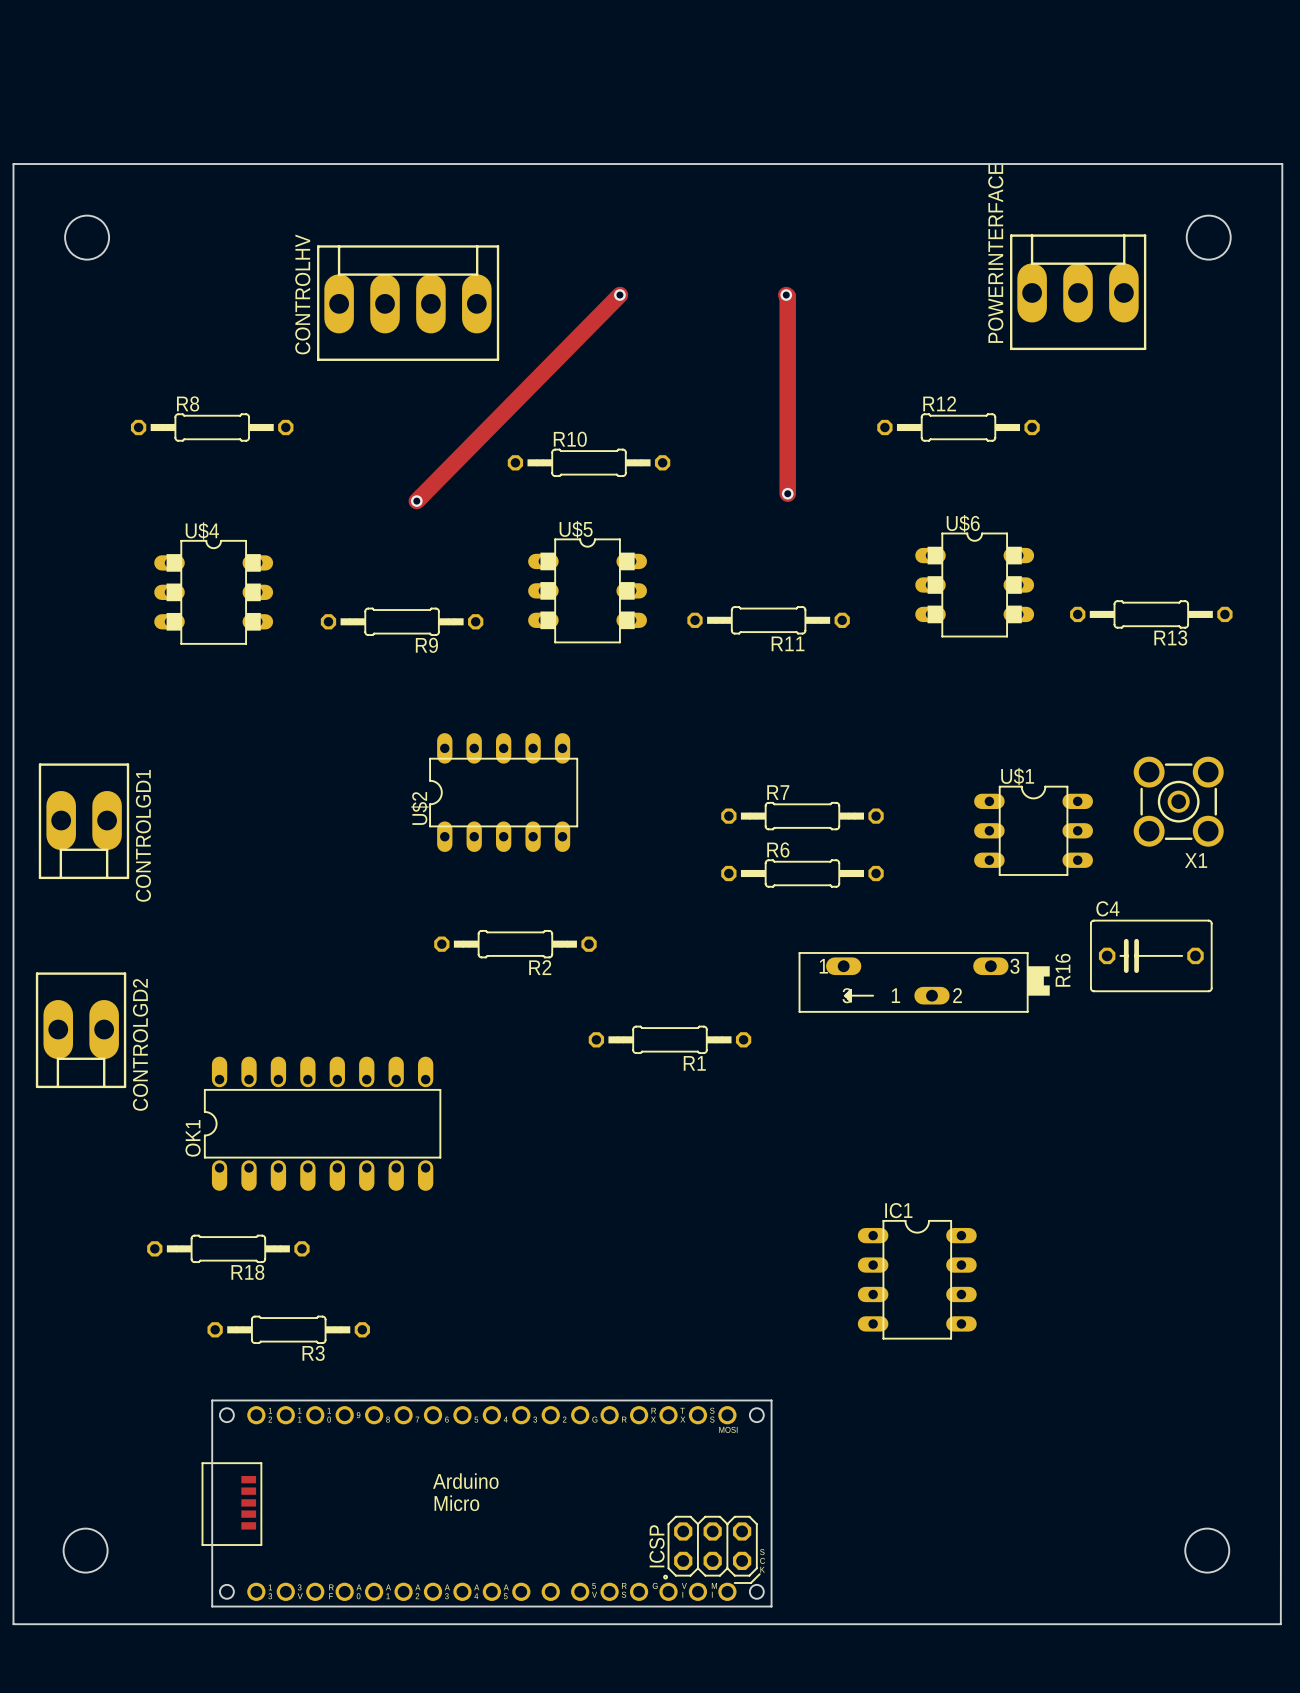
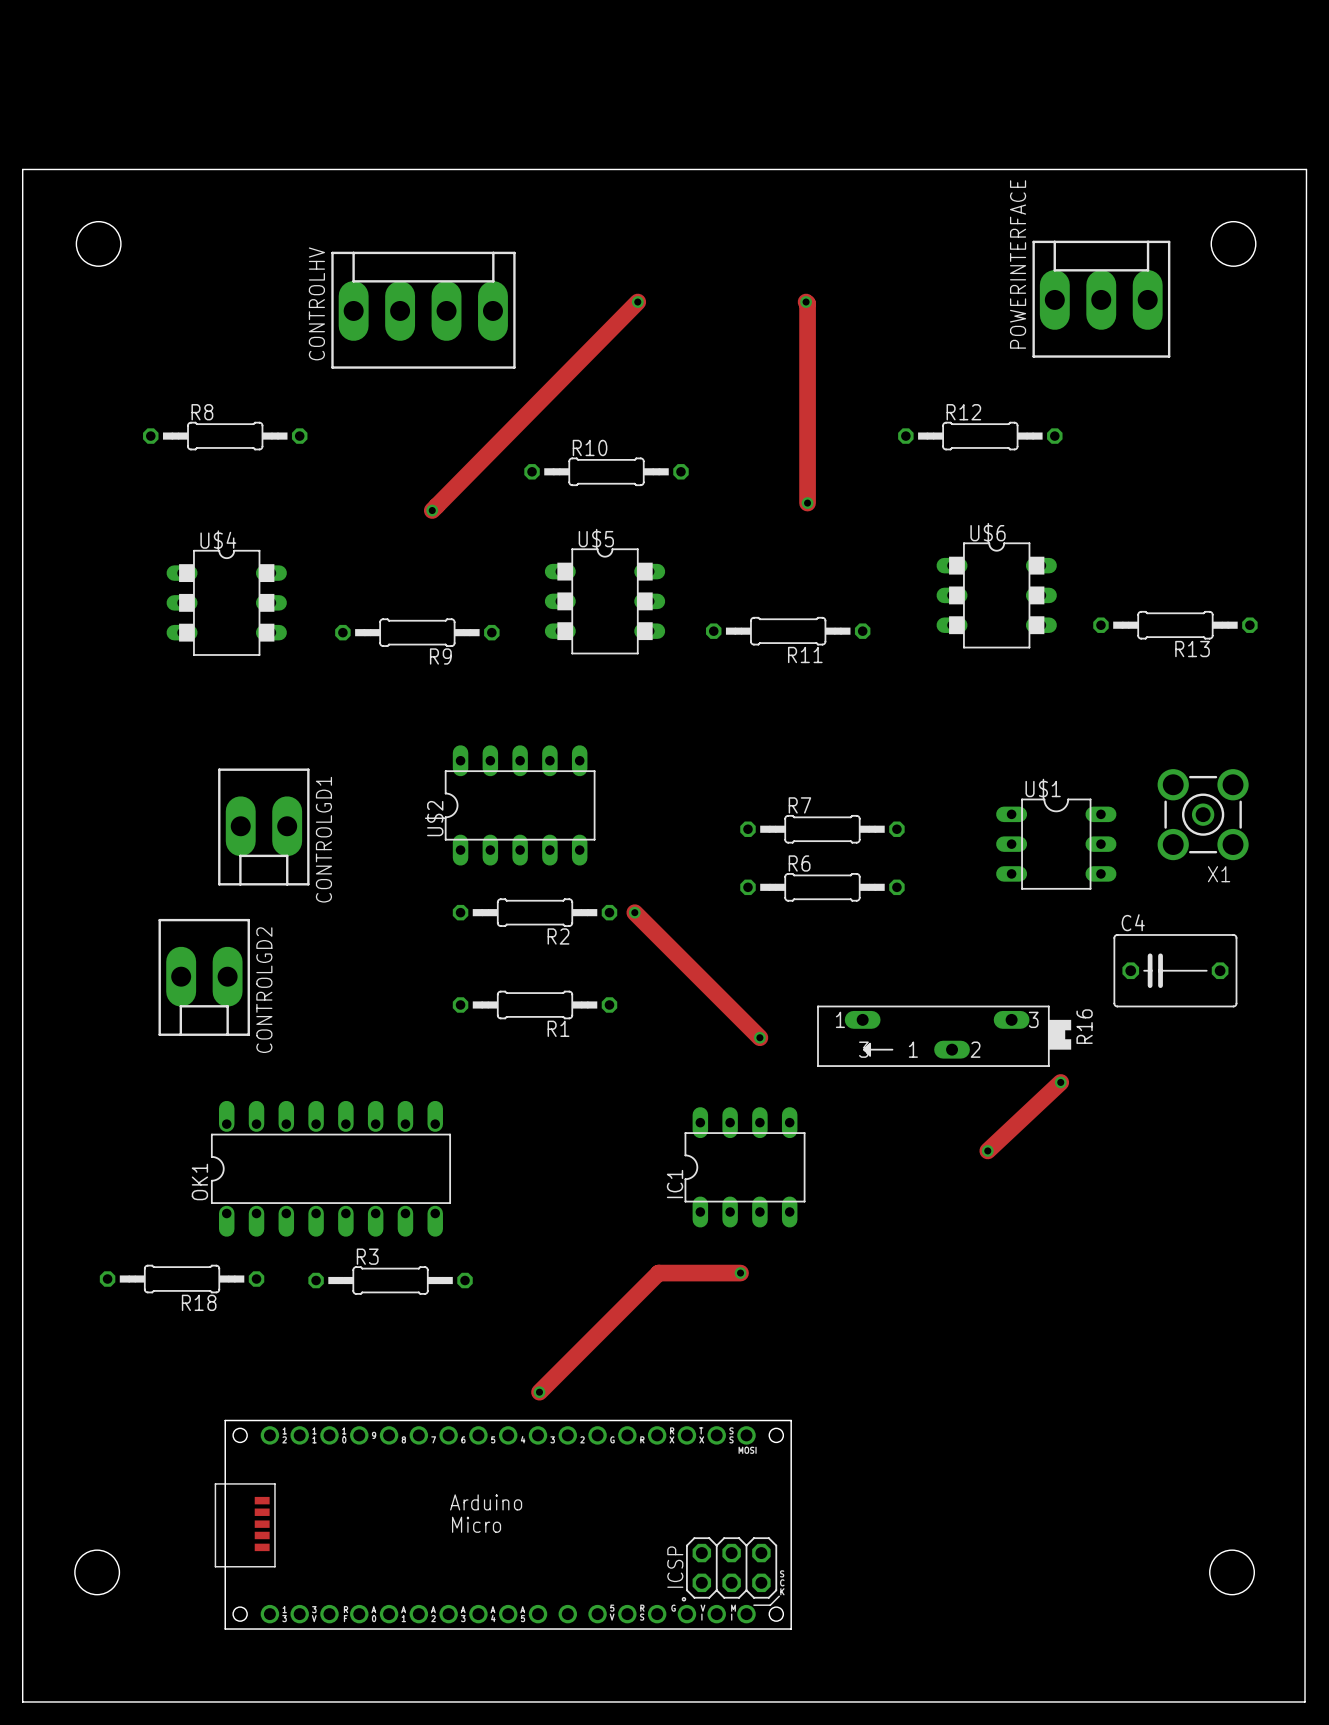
board edge: (13, 164) (13, 1624) (1280, 1624) (1280, 164) -> (24, 169) (22, 1701) (1305, 1701) (1306, 169)
CONTROLGD1 position: (83, 821) -> (263, 827)
track: none -> (634, 912) (759, 1037)
via: none -> (634, 912)
R2 position: (515, 944) -> (535, 912)
R16 position: (924, 982) -> (944, 1036)
via: none -> (759, 1037)
CONTROLGD2 position: (81, 1030) -> (204, 977)
R1 position: (669, 1039) -> (535, 1004)
track: none -> (1060, 1082) (987, 1150)
via: none -> (1060, 1082)
OK1 position: (322, 1123) -> (330, 1168)
via: none -> (987, 1150)
R18 position: (228, 1248) -> (182, 1279)
track: none -> (740, 1273) (658, 1273) (539, 1392)
via: none -> (740, 1273)
IC1 rotation: 0° (917, 1279) -> 90° counterclockwise (745, 1167)
IC1 position: (917, 1279) -> (745, 1167)
R3 position: (288, 1329) -> (390, 1280)
R3 name position: R3 (313, 1353) -> R3 (367, 1256)
via: none -> (539, 1392)

